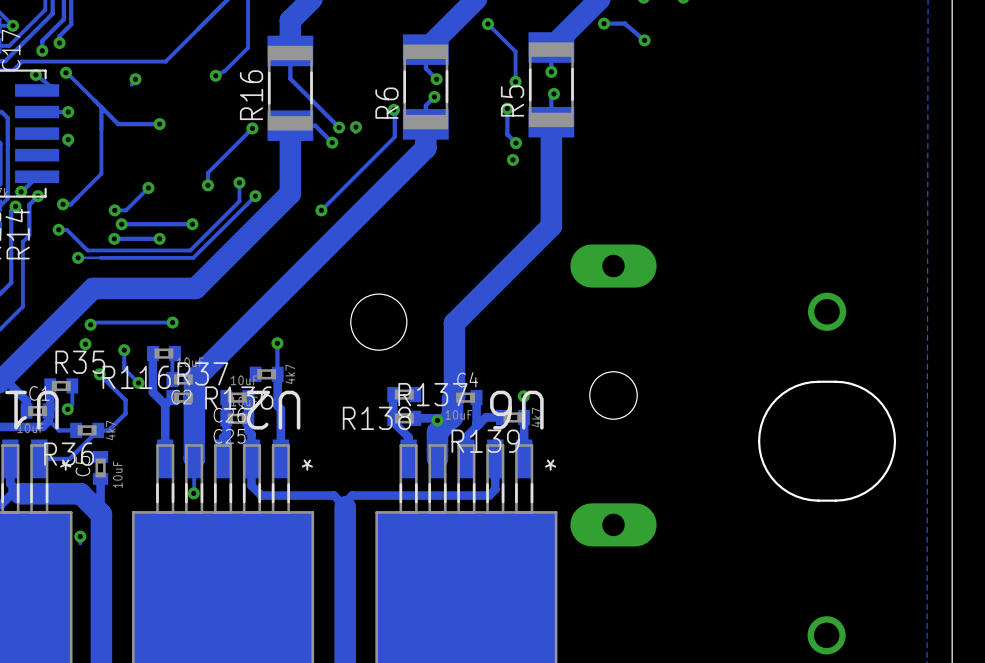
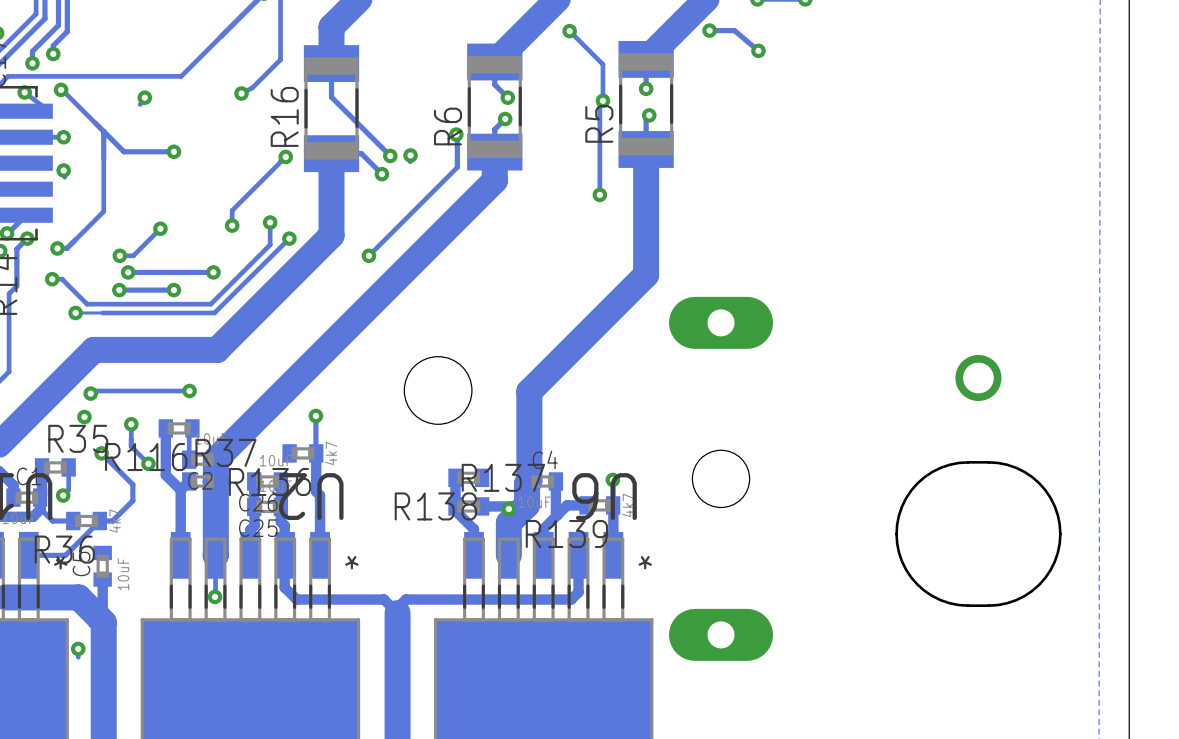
track: none -> (599, 103) (599, 194)
track: (507, 108) (507, 134) (516, 143) -> none
via: (507, 108) -> none
via: (516, 143) -> none

